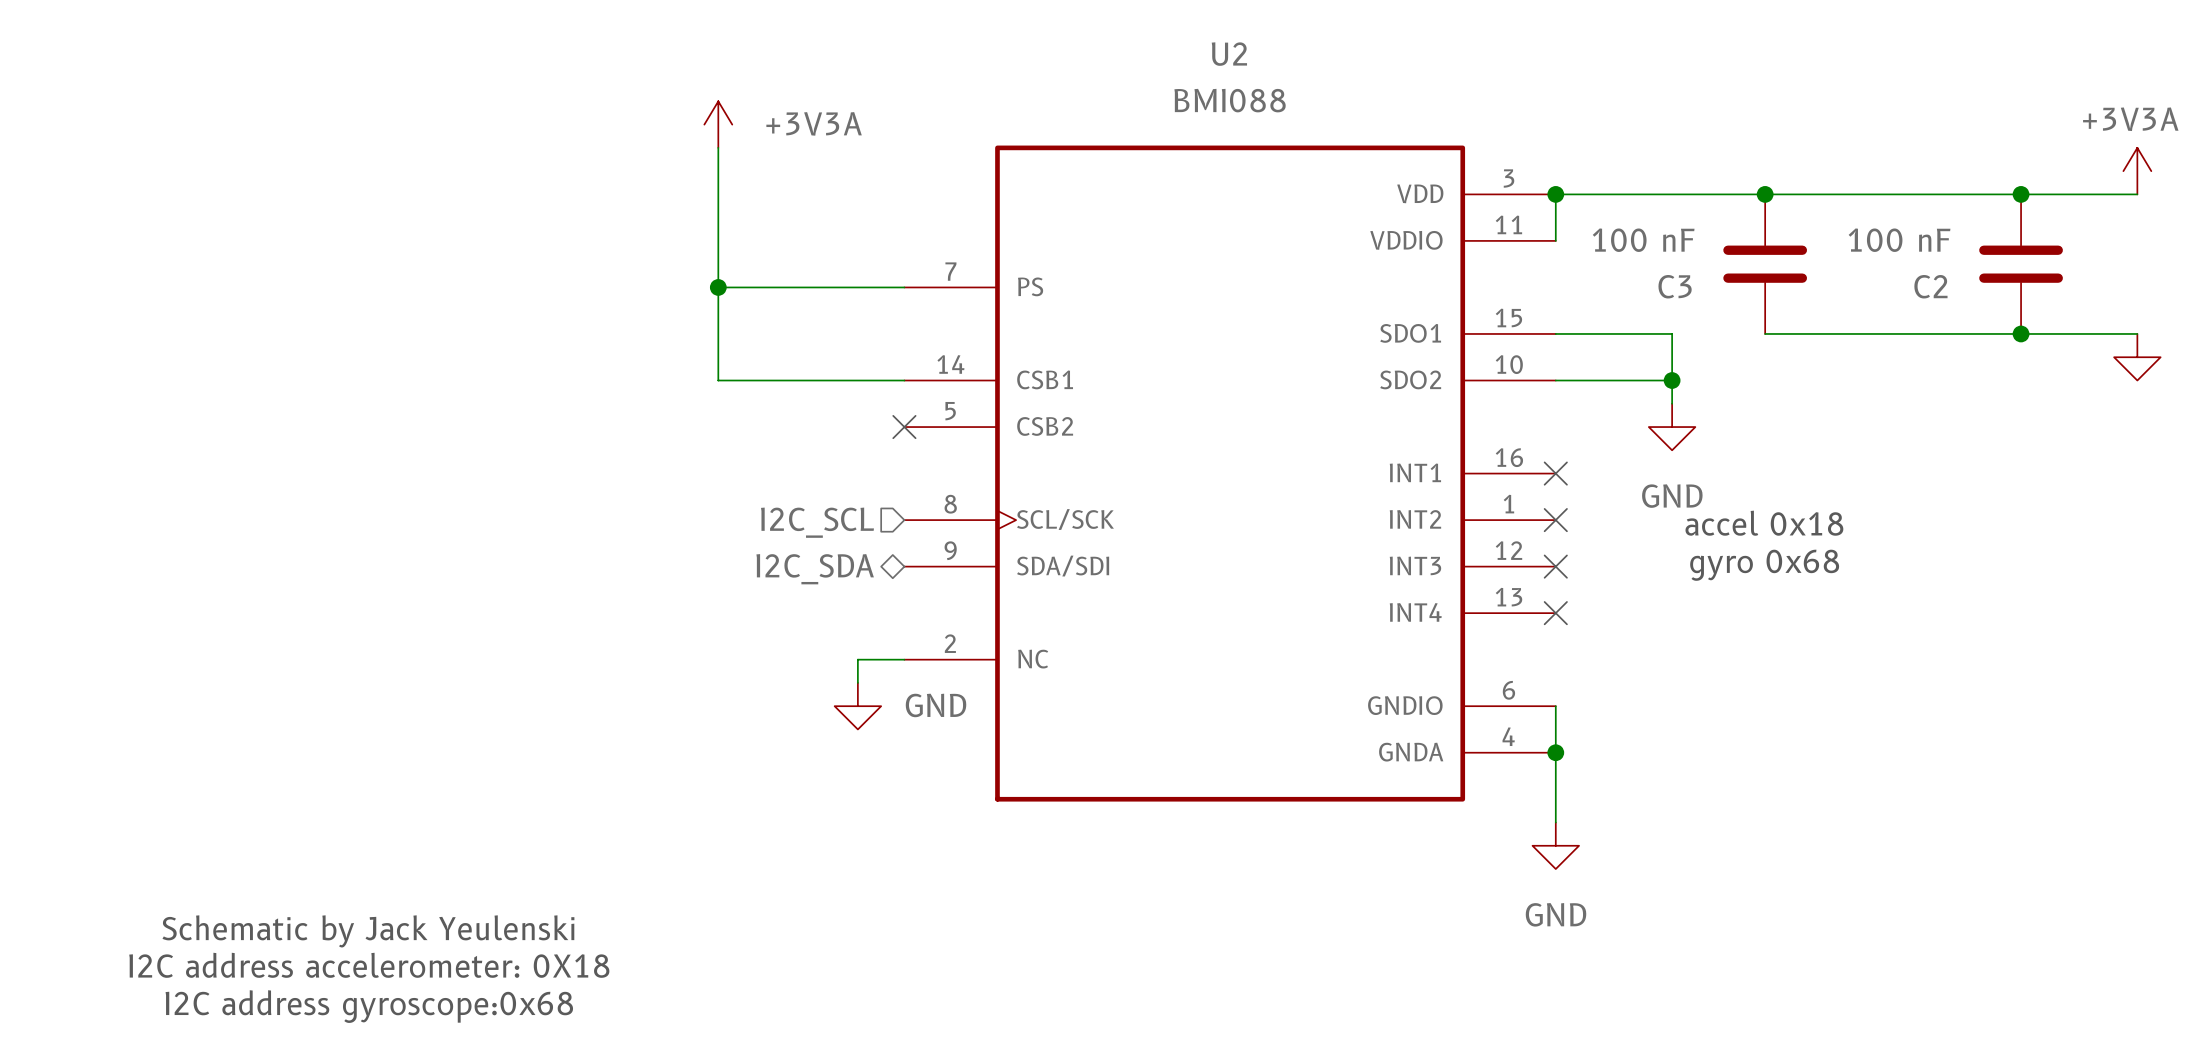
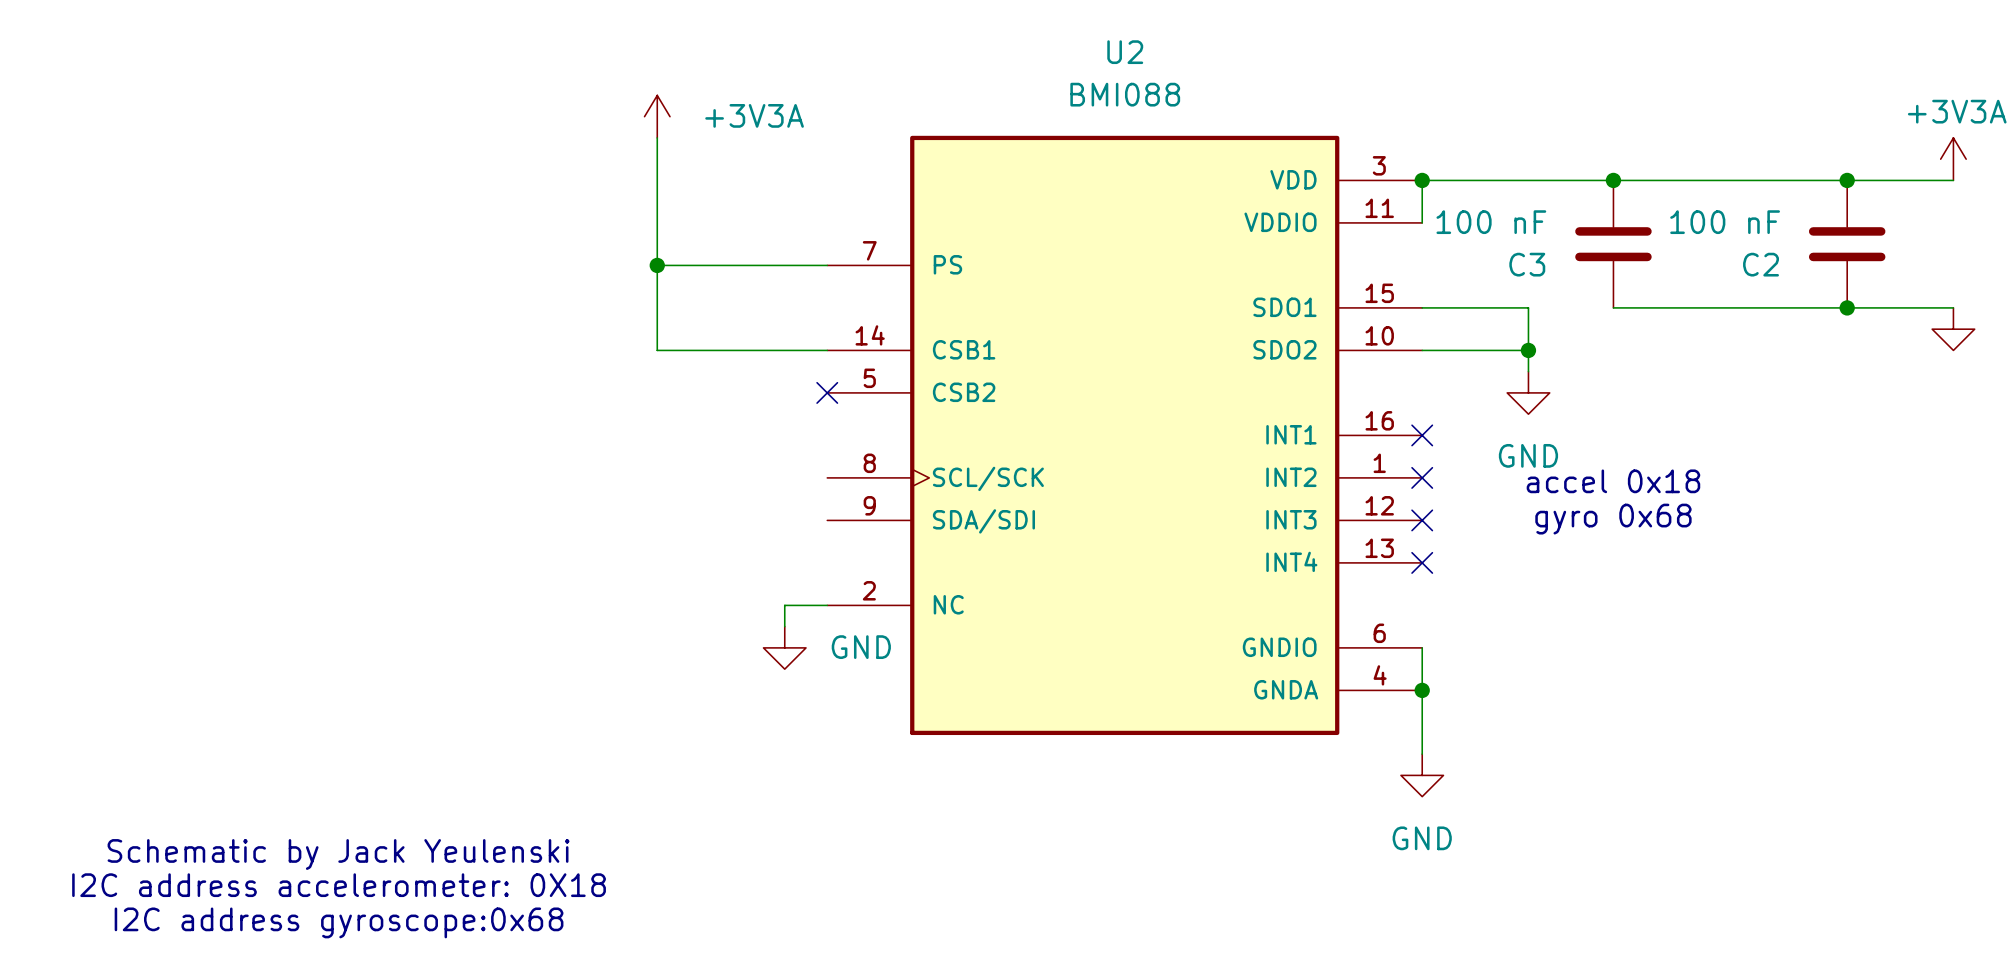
hierarchical label: I2C_SCL (817, 522) -> none
hierarchical label: I2C_SDA (815, 569) -> none

